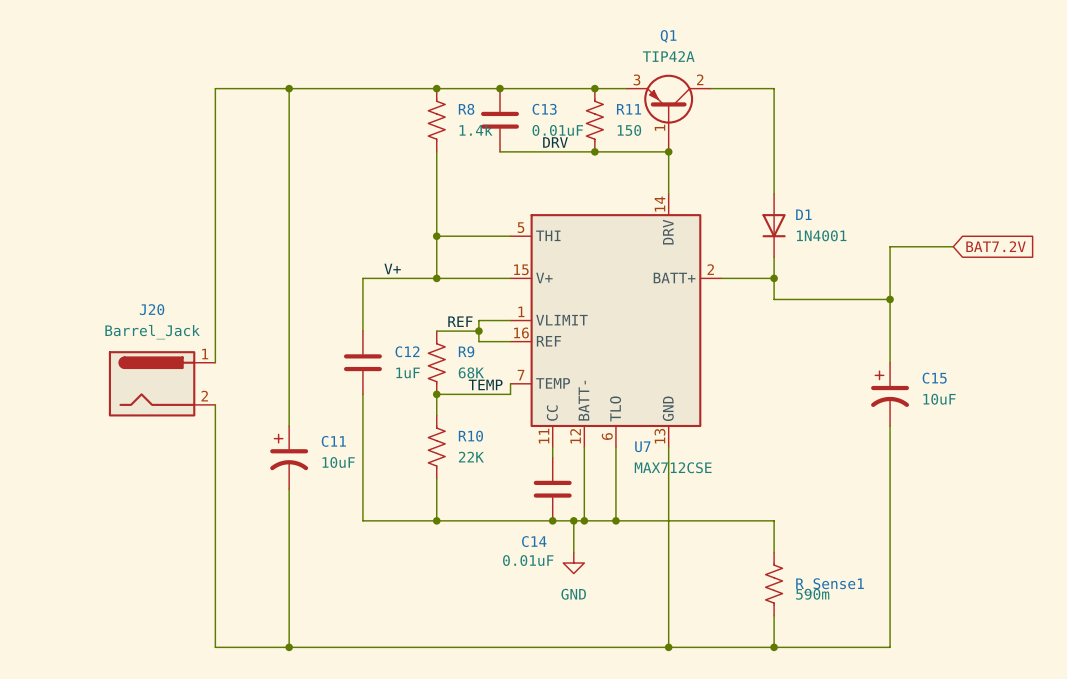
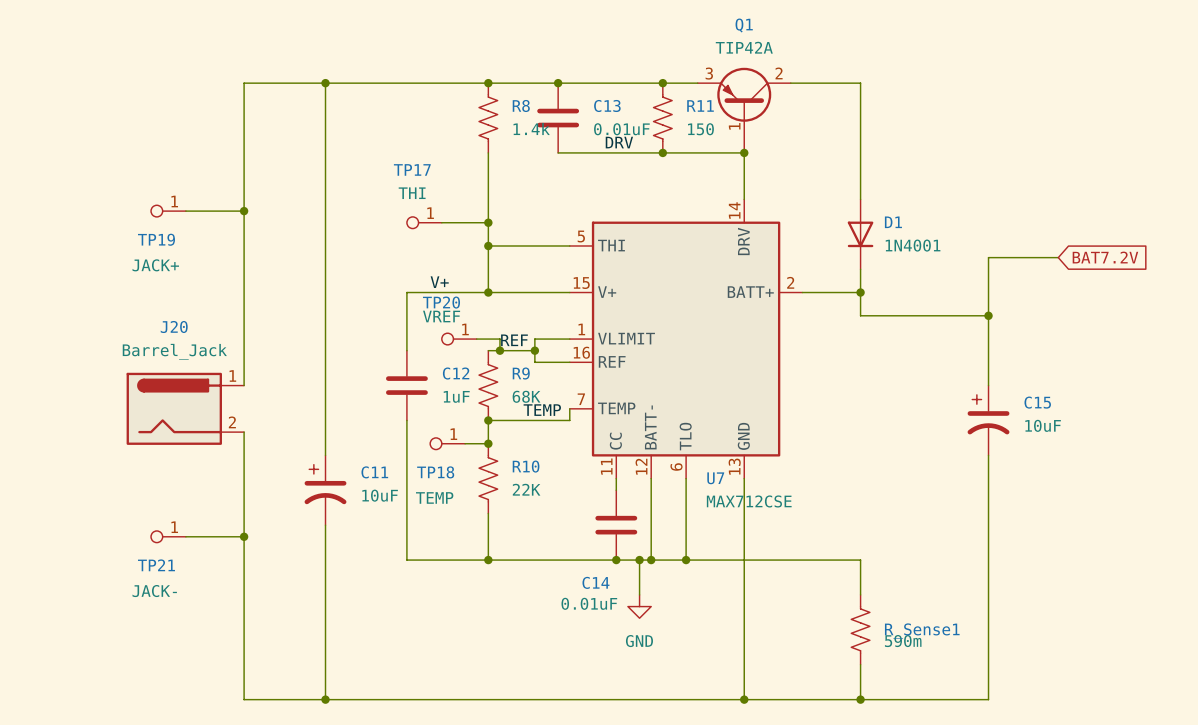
TP19: none -> JACK+ (168, 211)
wire: none -> (185, 211) (244, 211)
junction: none -> (244, 211)
TP17: none -> THI (424, 222)
wire: none -> (441, 222) (488, 222)
junction: none -> (488, 222)
TP20: none -> VREF (459, 339)
wire: none -> (476, 339) (499, 339) (499, 350)
junction: none -> (499, 350)
TP18: none -> TEMP (447, 443)
wire: none -> (465, 443) (488, 443)
junction: none -> (488, 443)
TP21: none -> JACK- (168, 536)
wire: none -> (185, 536) (244, 536)
junction: none -> (244, 536)

